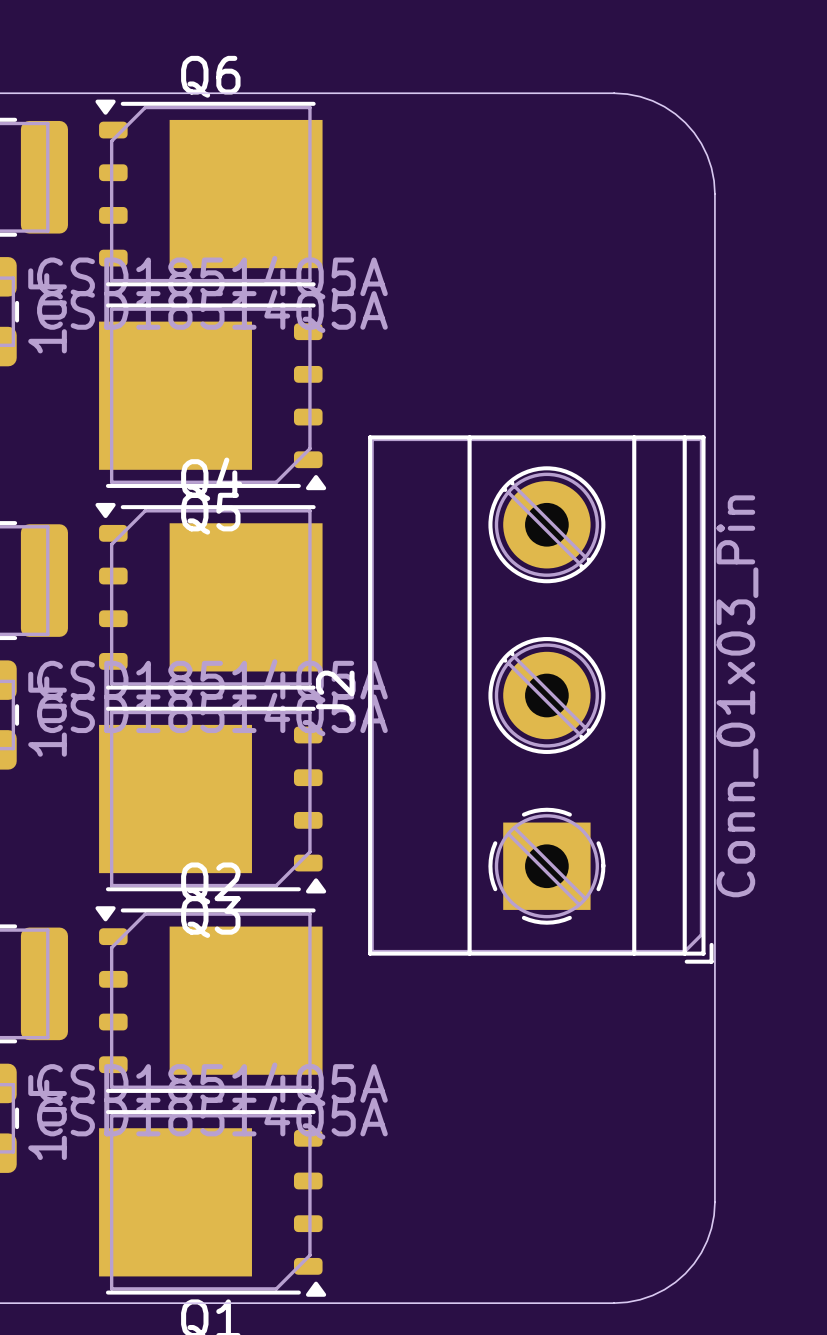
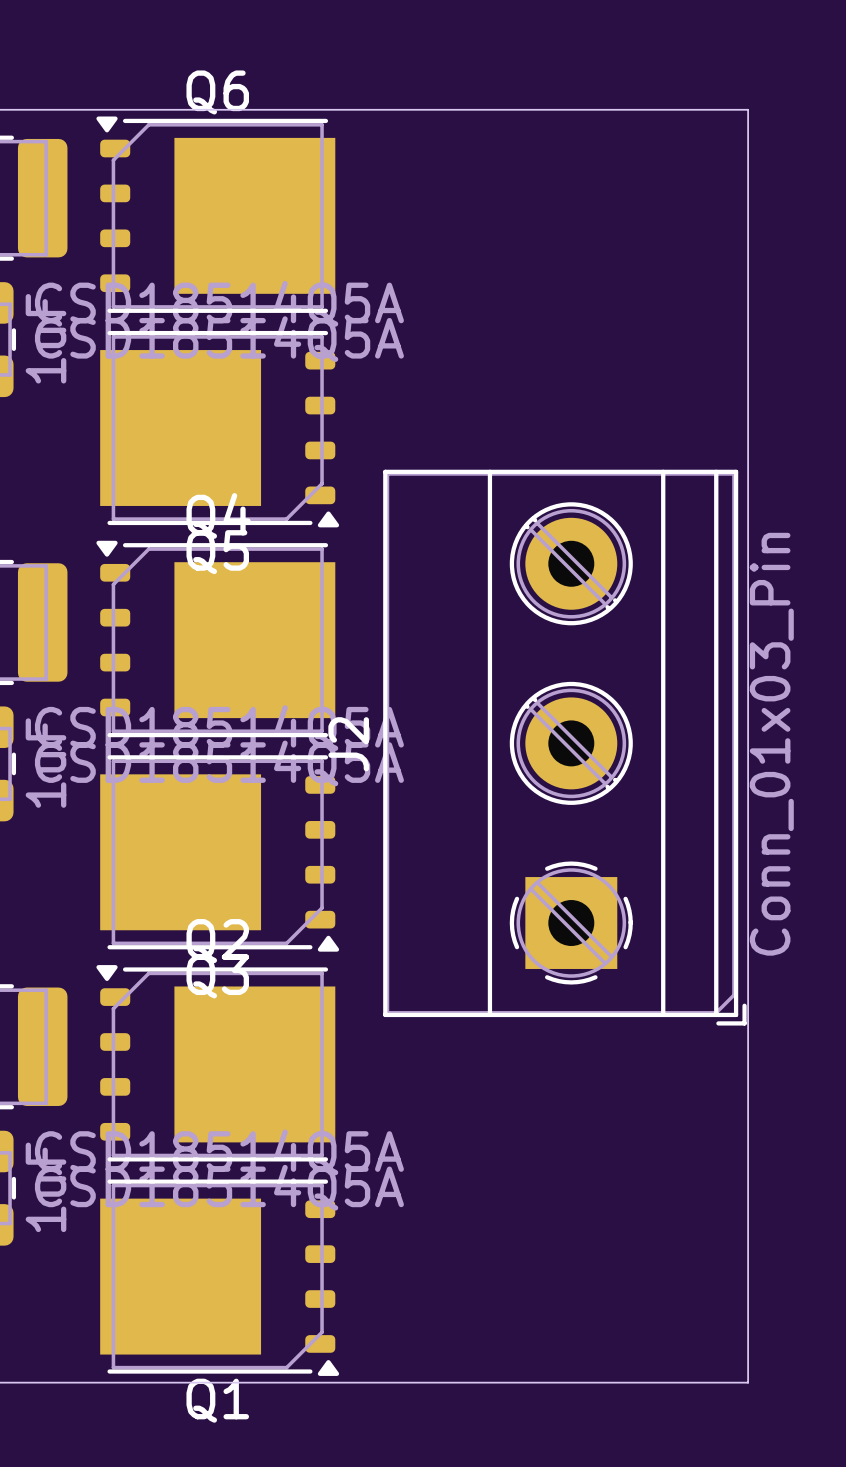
board edge: (614, 93) (627, 94) (652, 100) (664, 106) (685, 122) (694, 132) (707, 155) (711, 167) (714, 194) -> (642, 109) (748, 109) (748, 215)
board edge: (714, 1202) (714, 1215) (707, 1240) (701, 1252) (685, 1273) (664, 1289) (652, 1295) (627, 1302) (614, 1303) -> (748, 1276) (748, 1382) (642, 1382)

